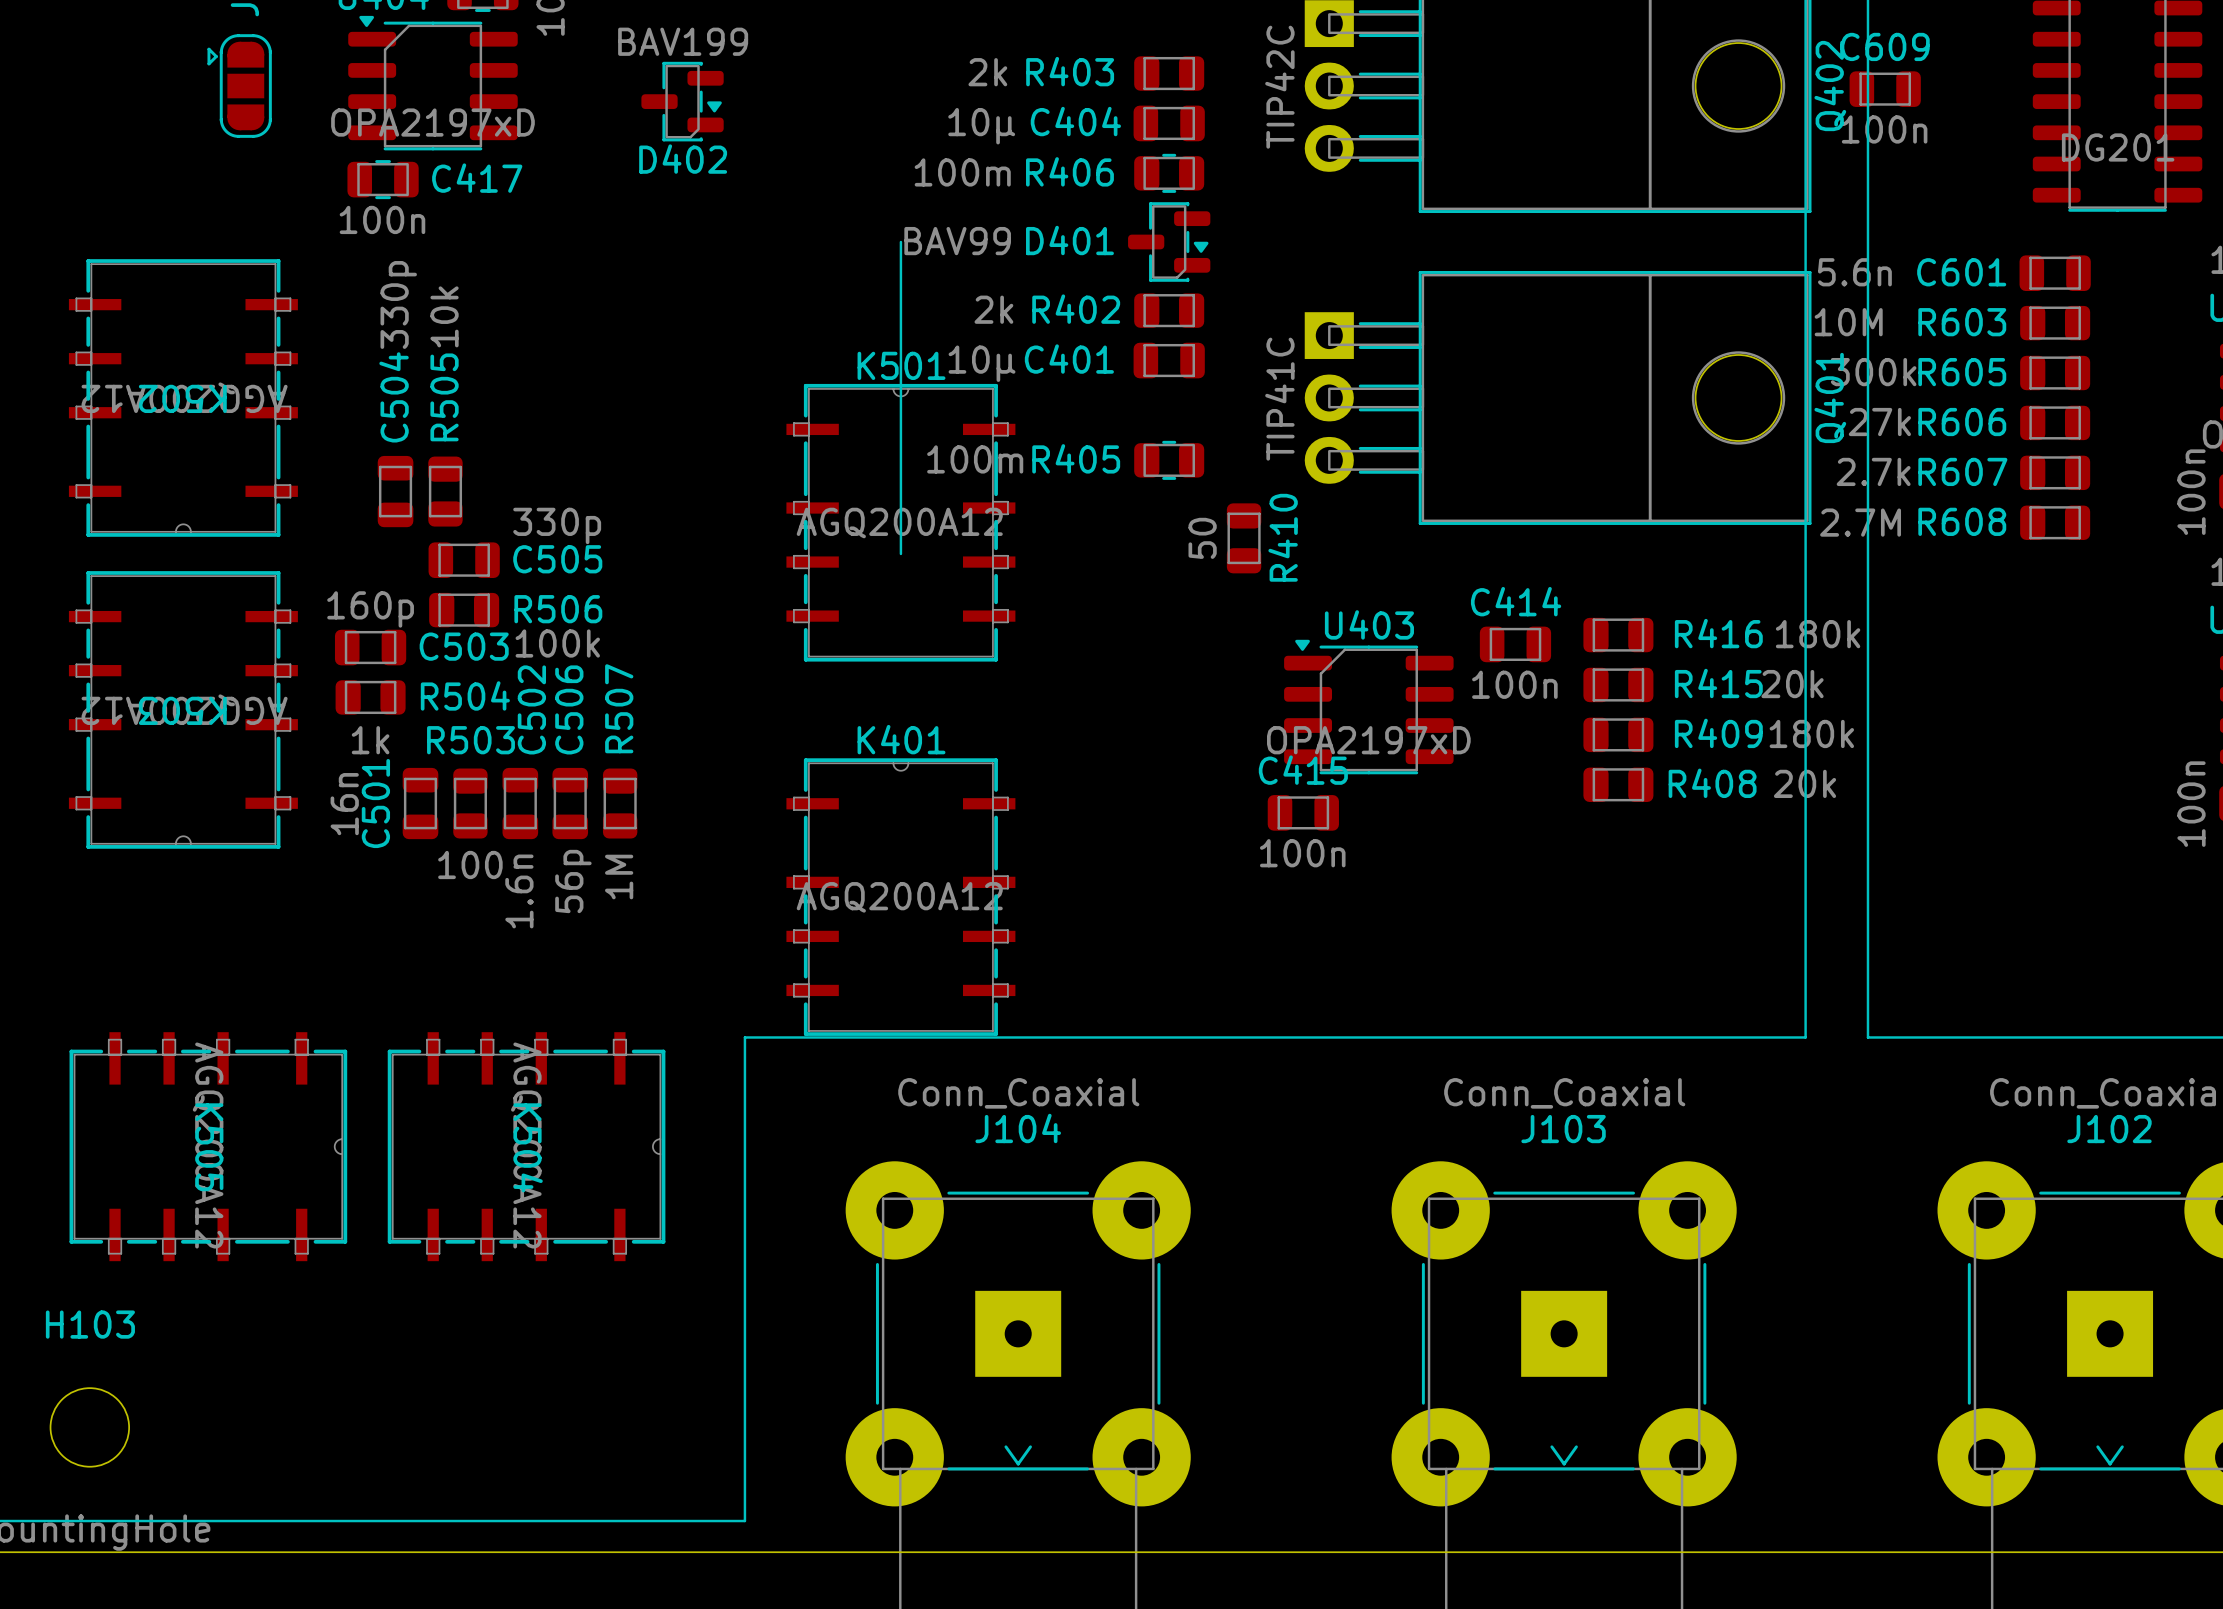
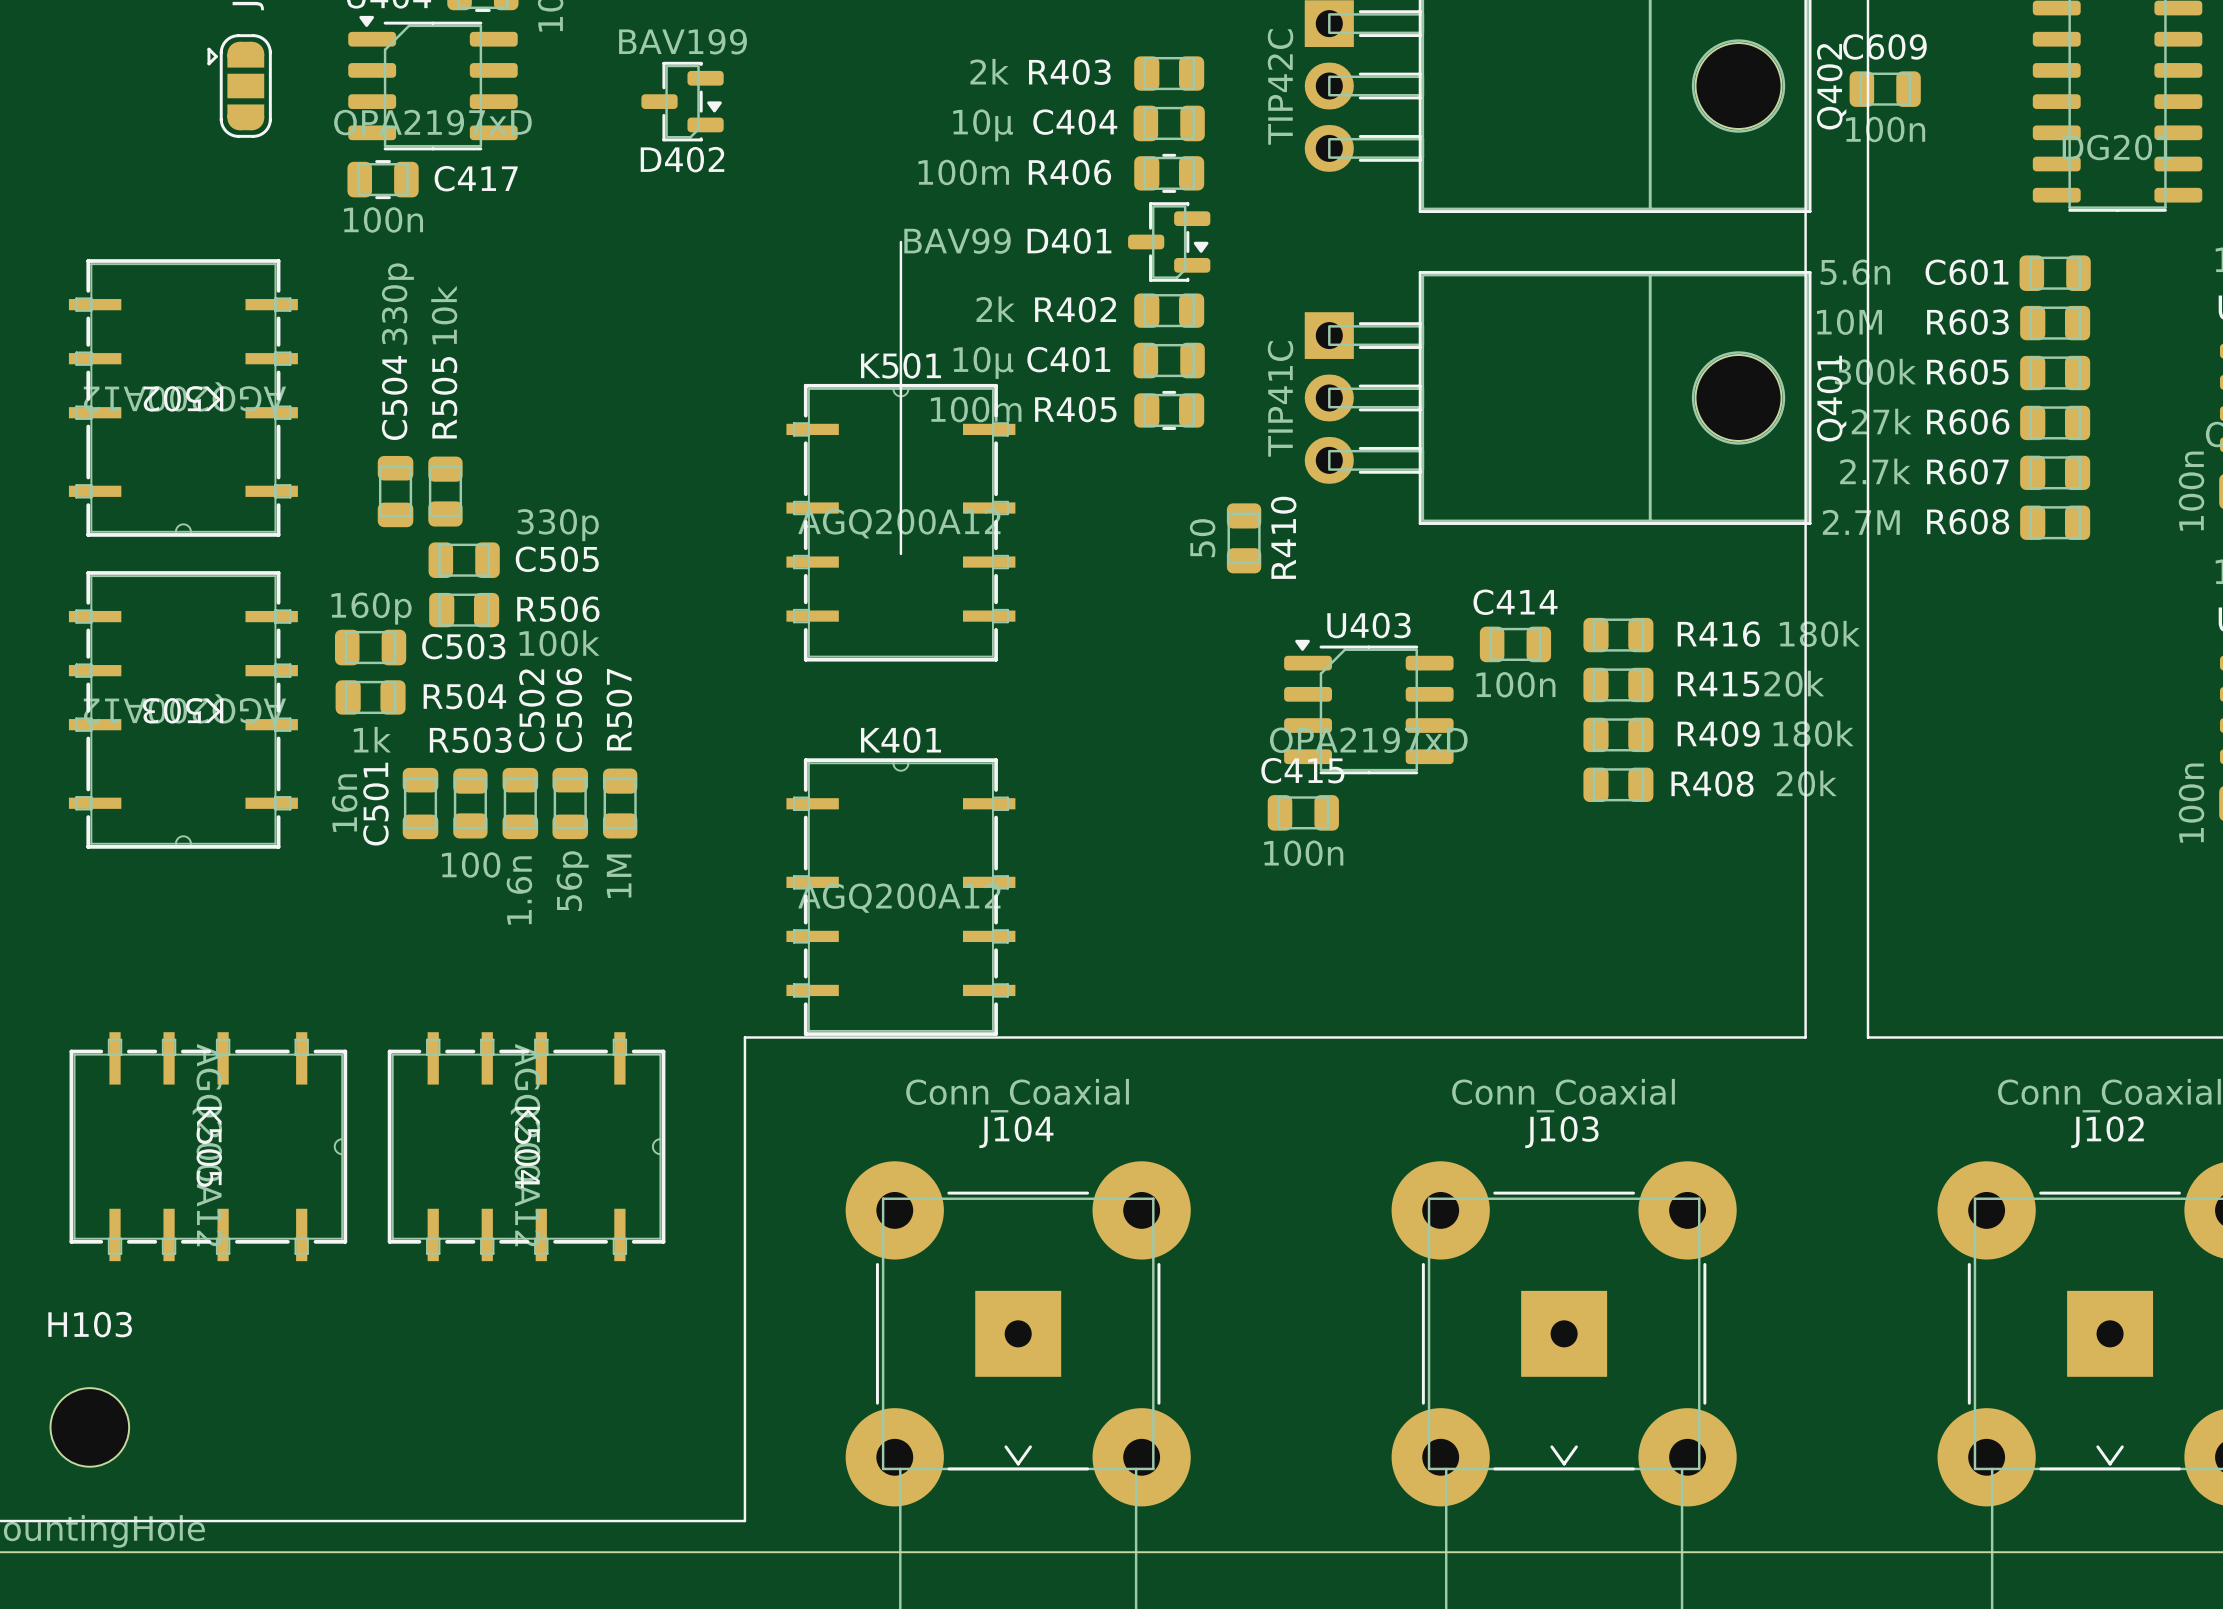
R405 position: (1169, 460) -> (1169, 410)

